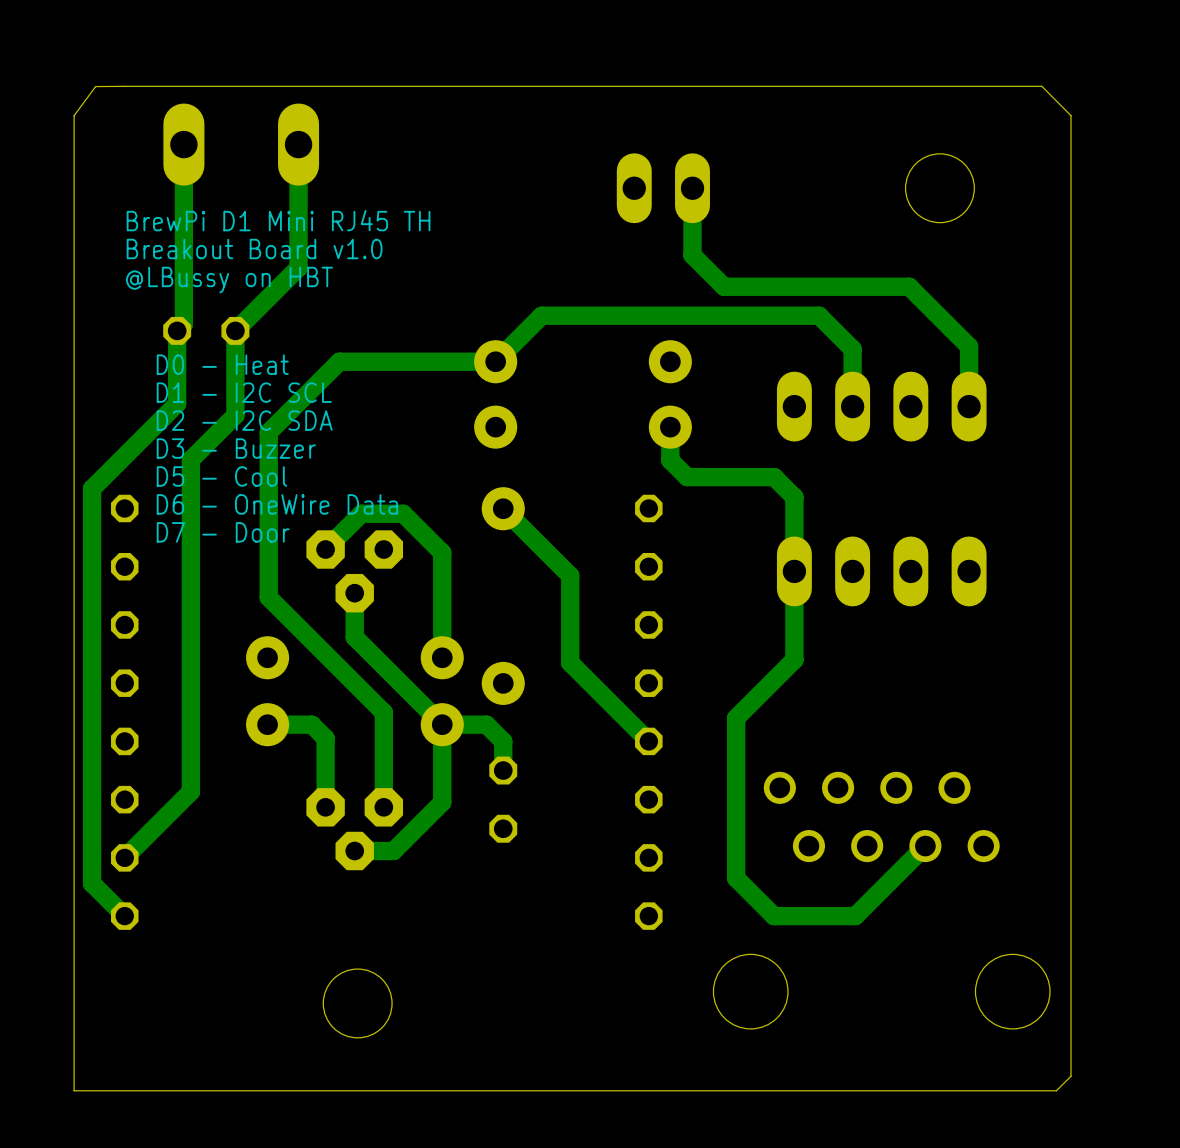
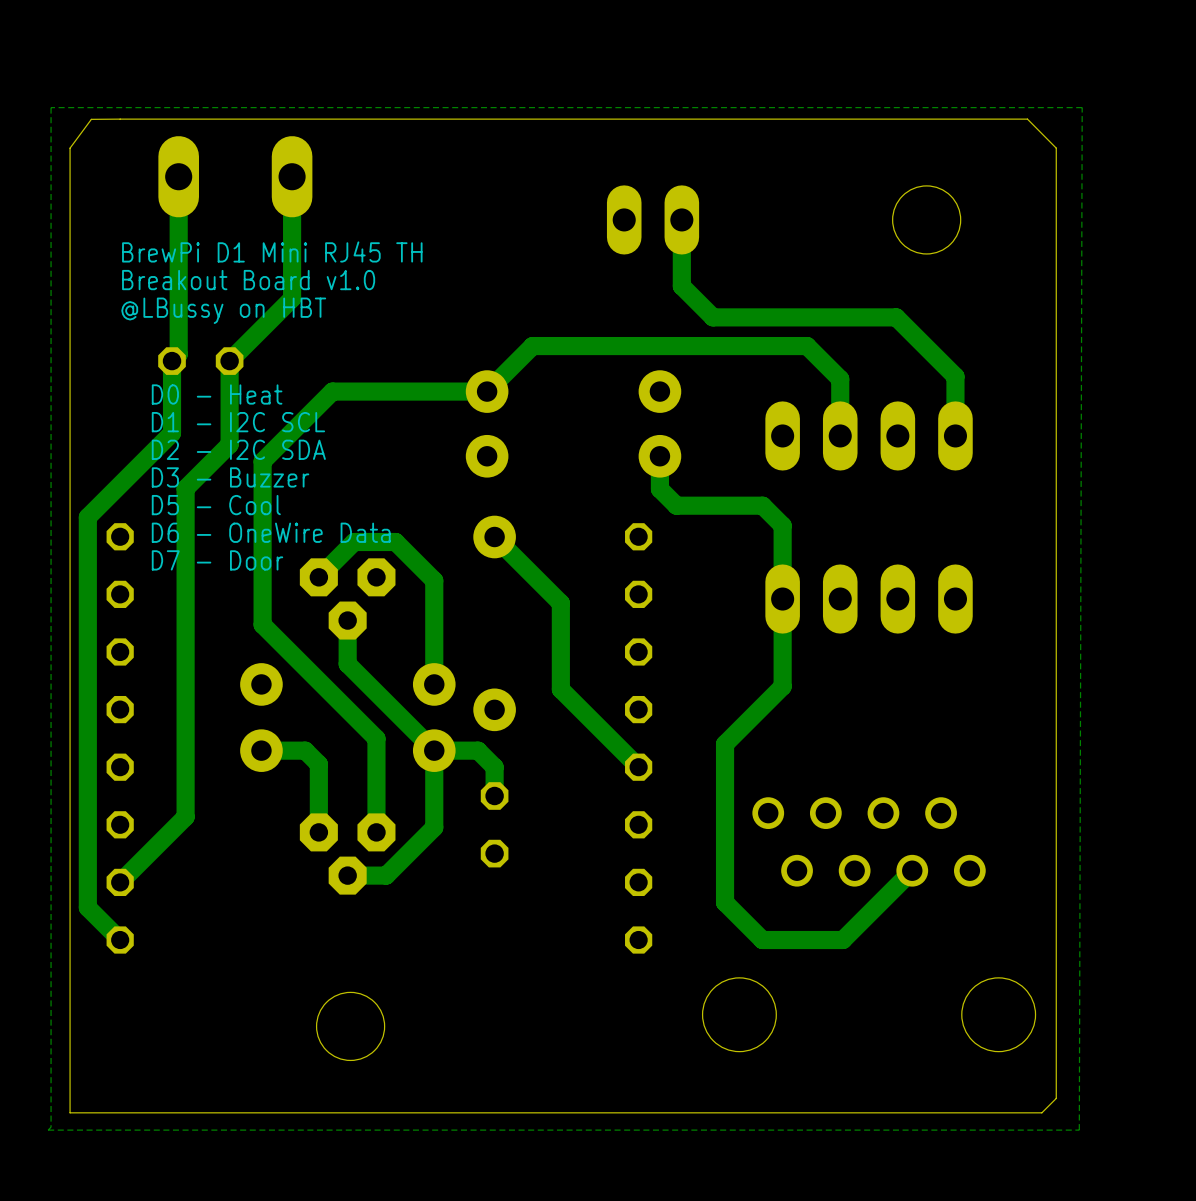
zone outline: none -> (1082, 107) (1079, 1130) (48, 1130) (51, 1127) (51, 107) (1082, 107)

